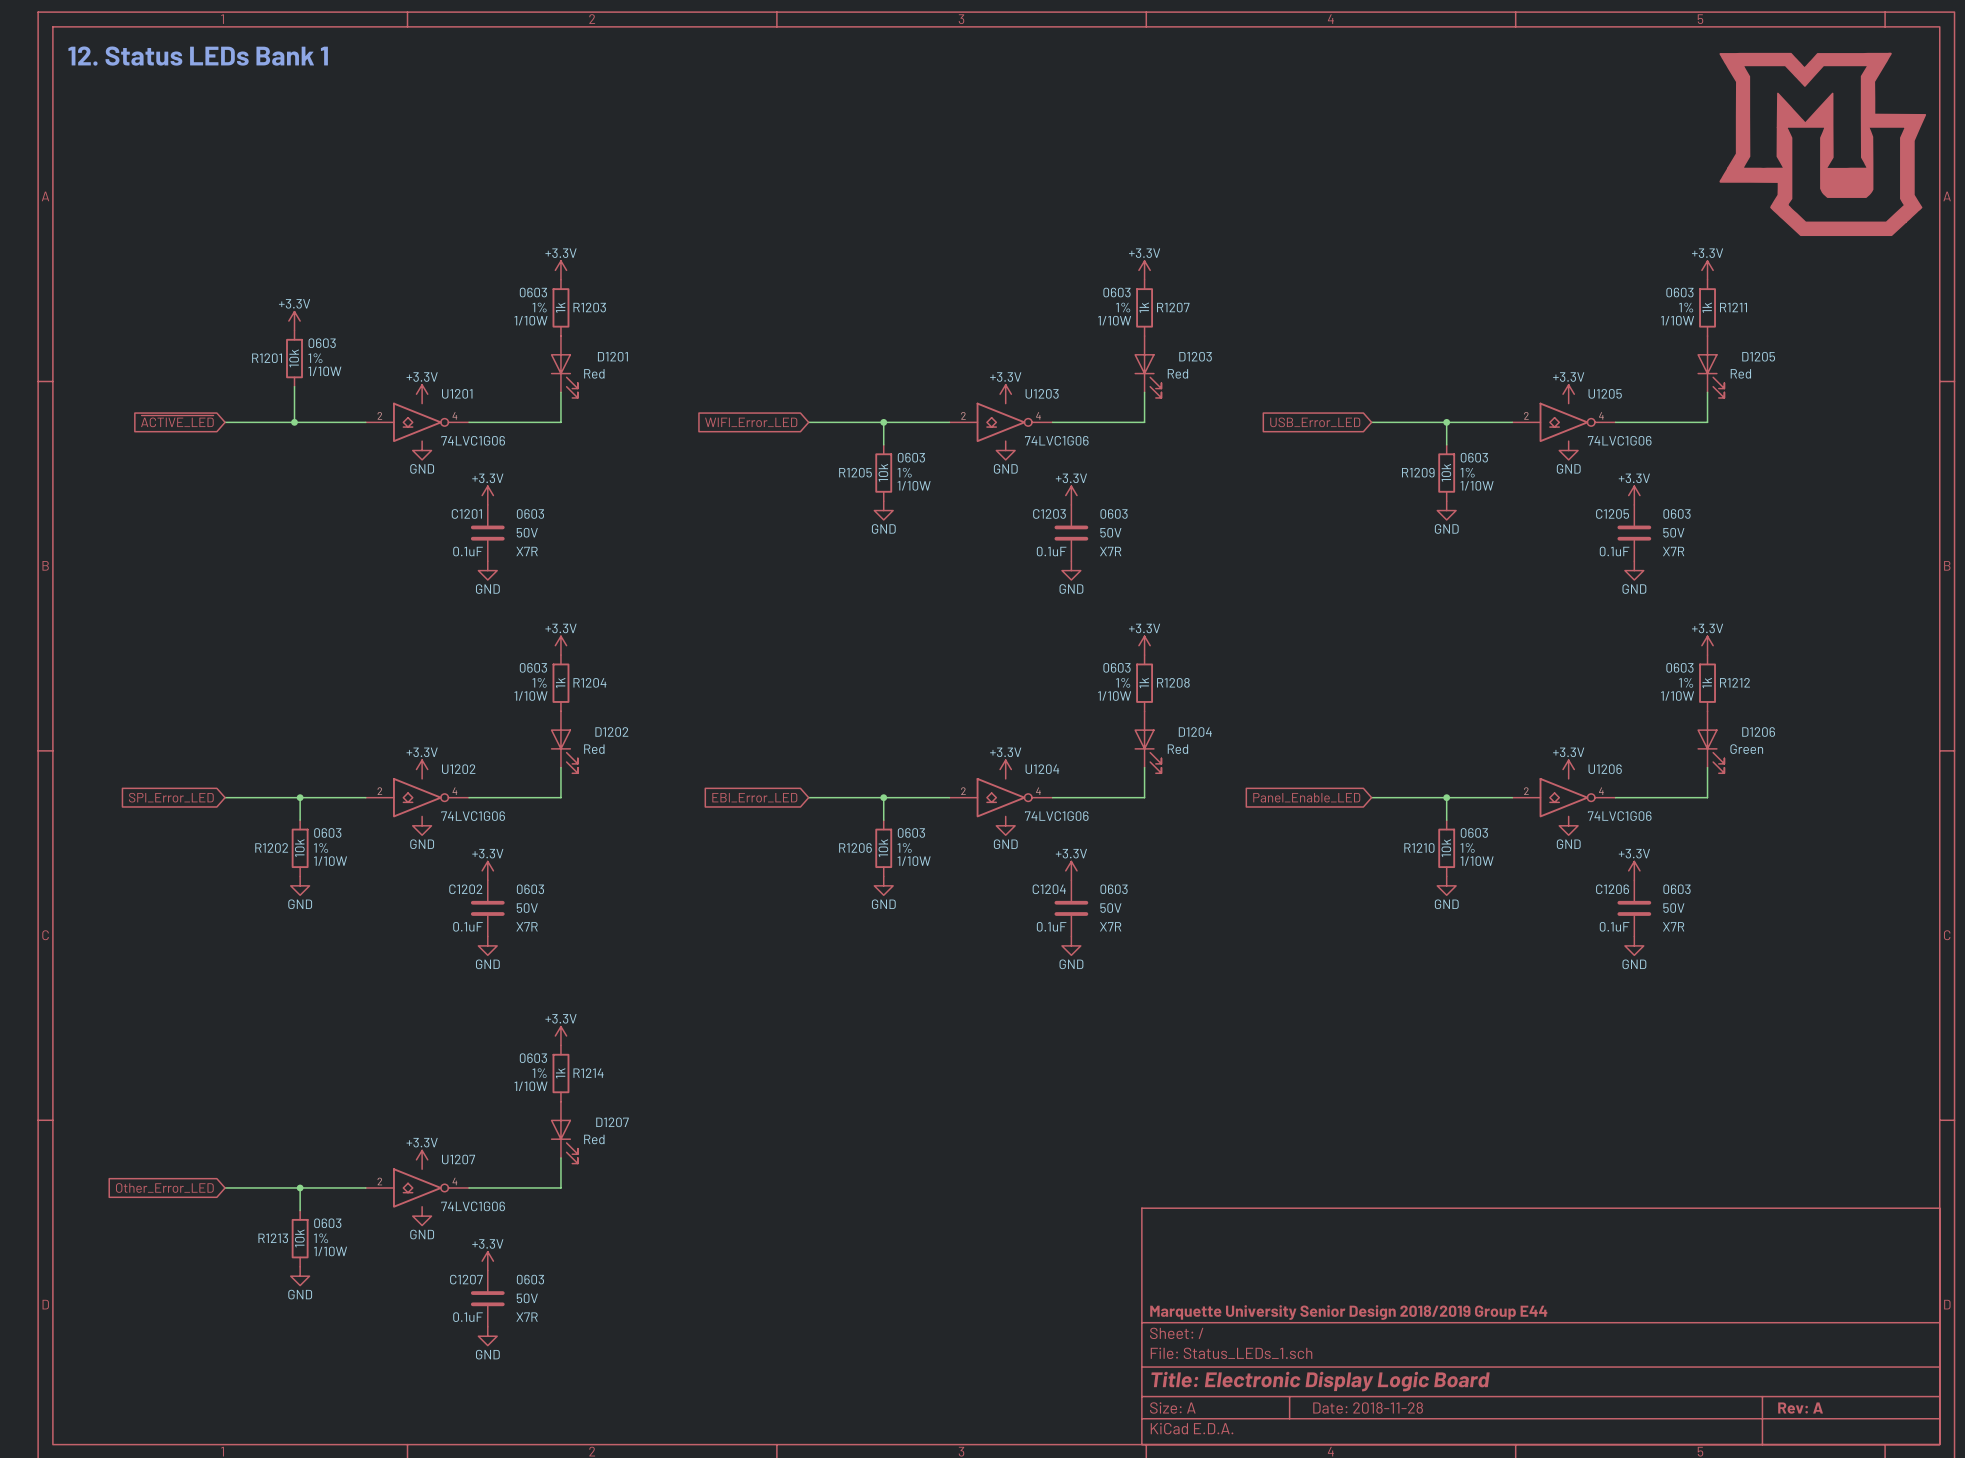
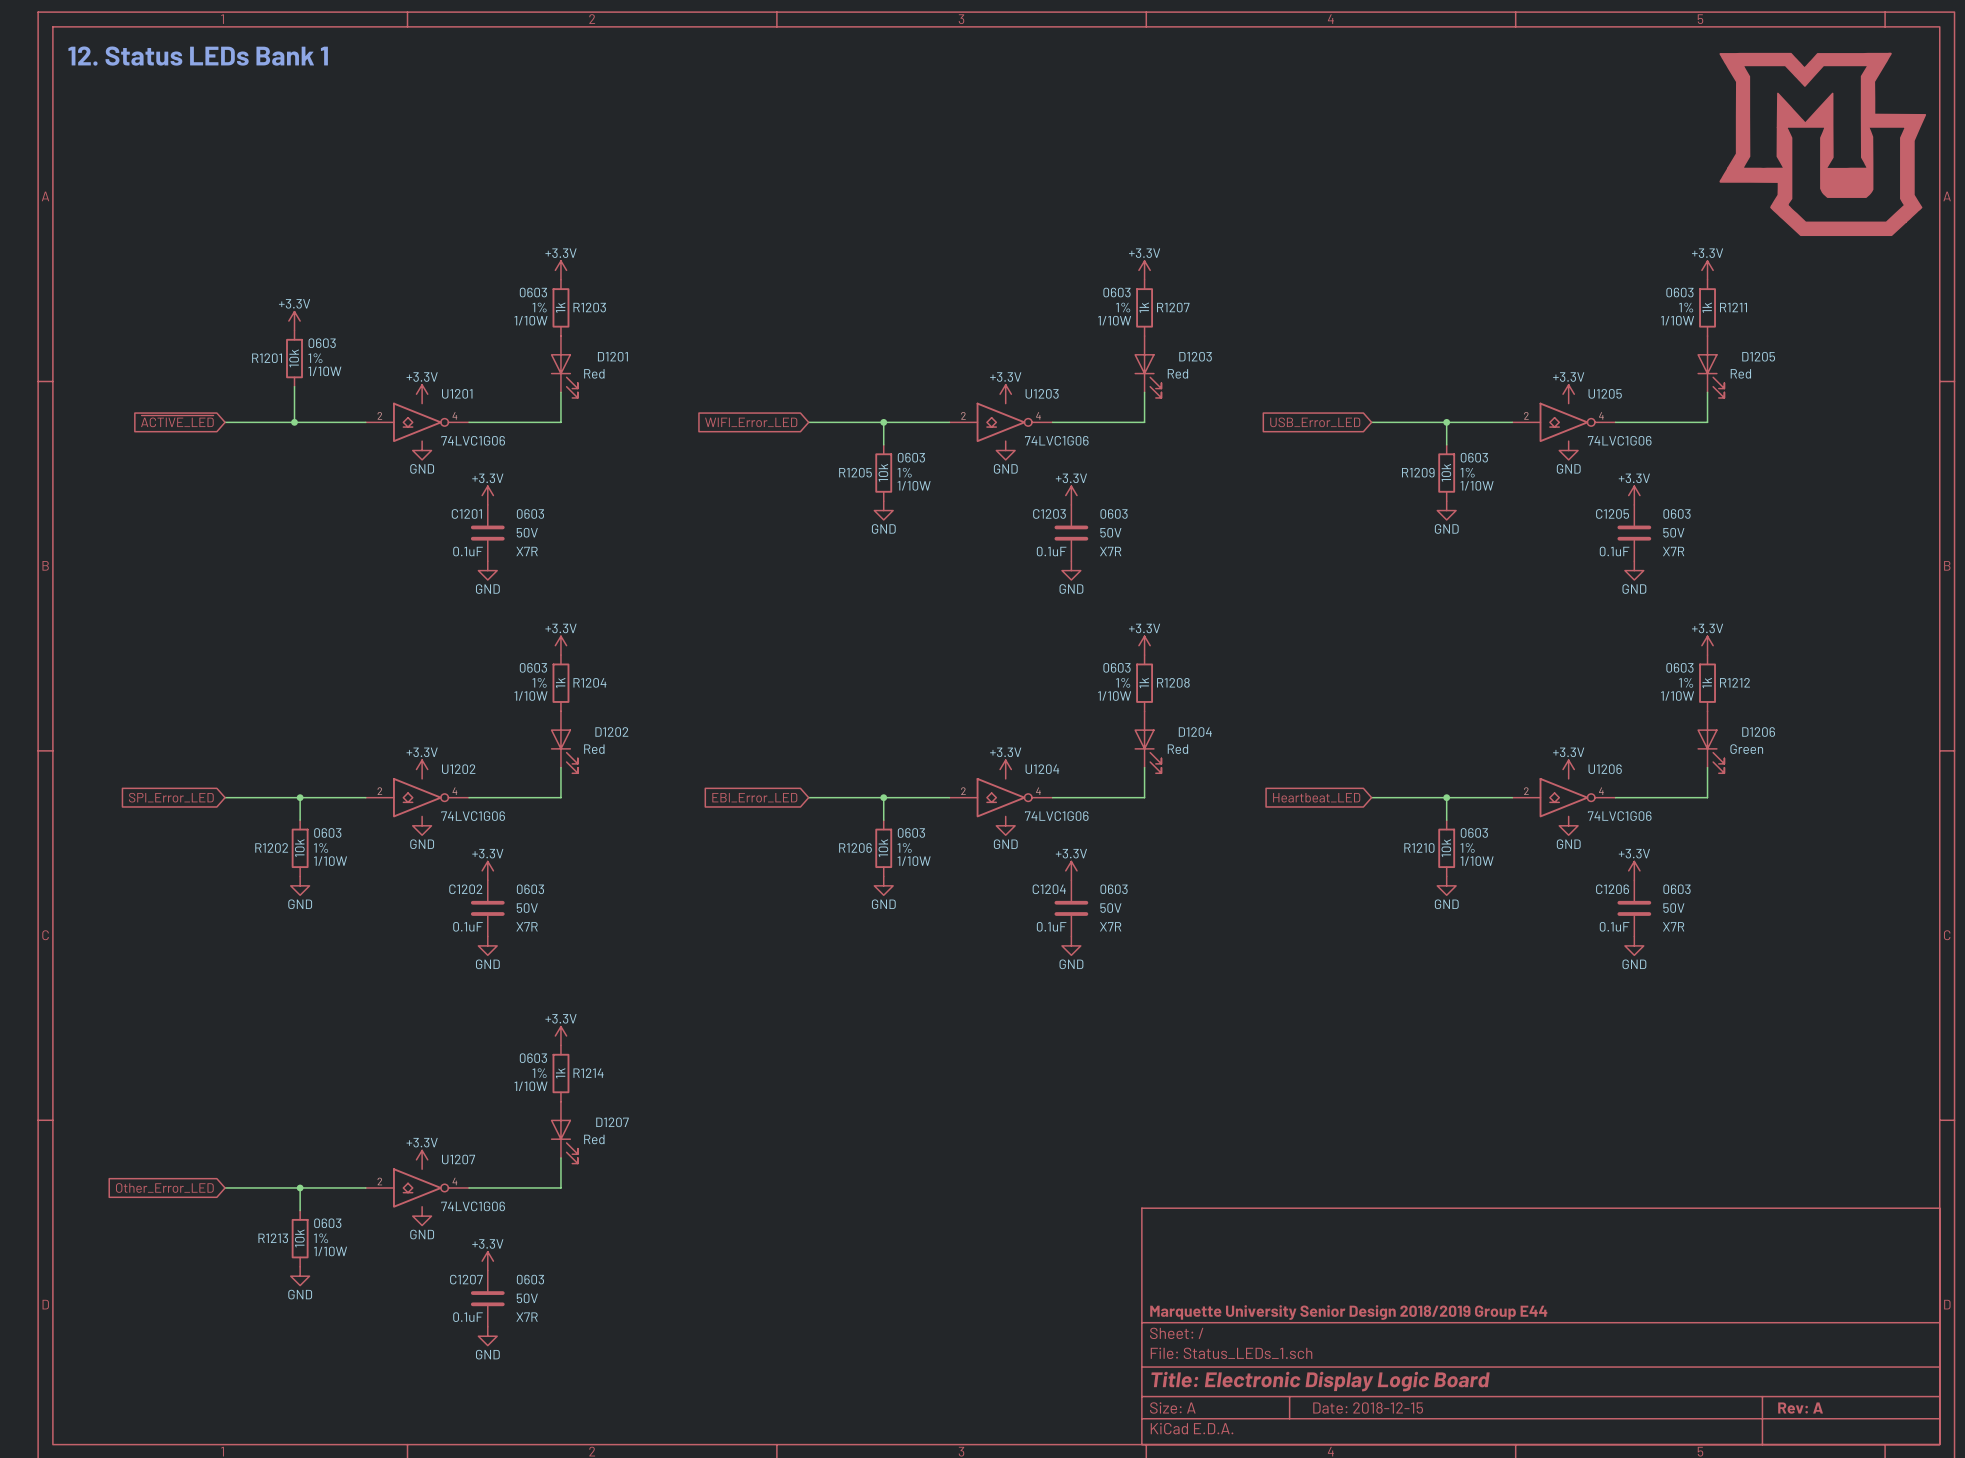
global label: Panel_Enable_LED (1306, 797) -> Heartbeat_LED (1316, 797)
title block: Date: 2018-11-28 (1368, 1407) -> Date: 2018-12-15 (1368, 1407)

